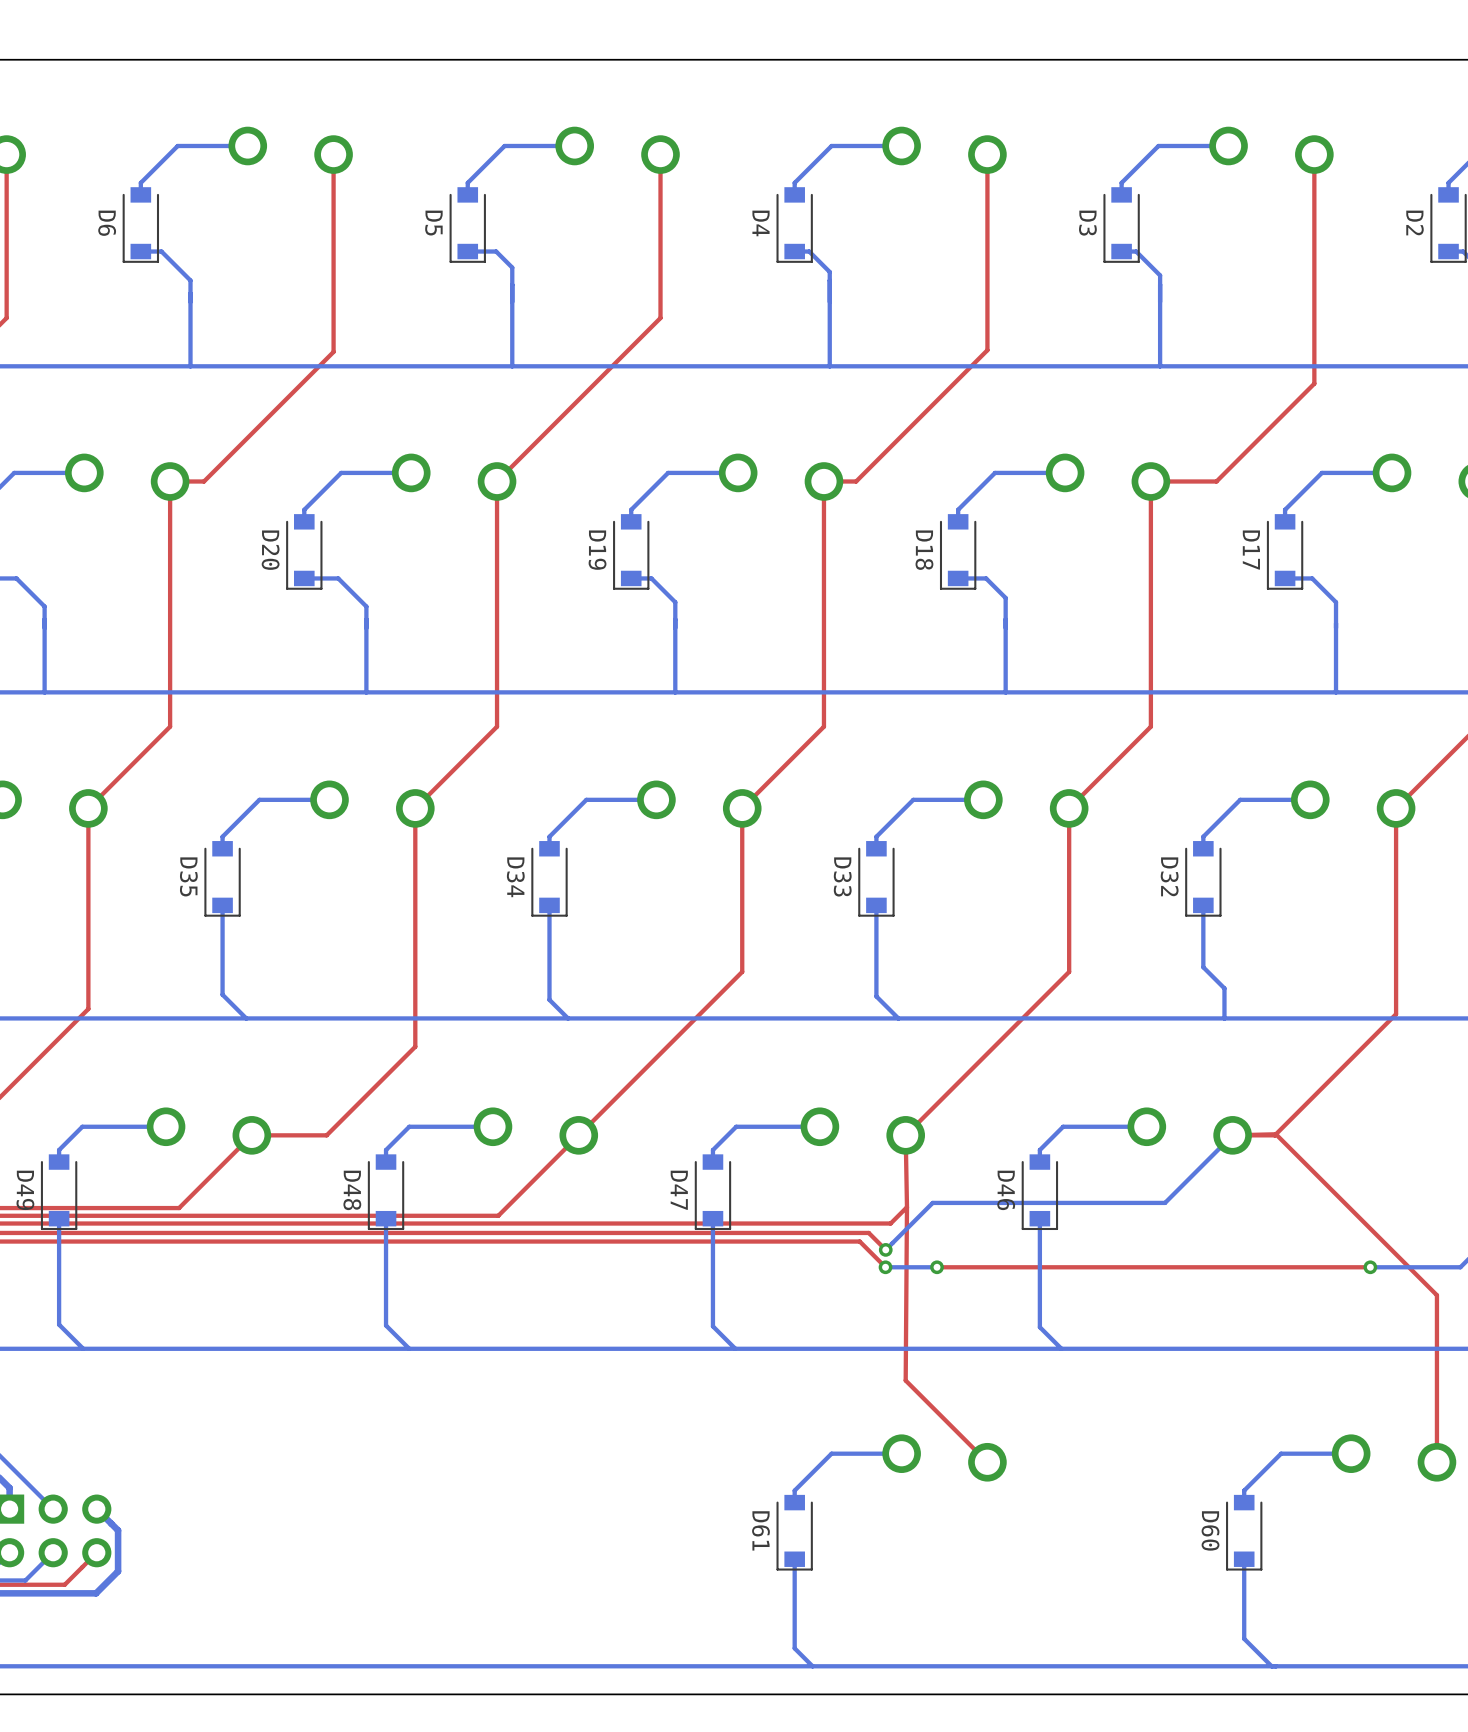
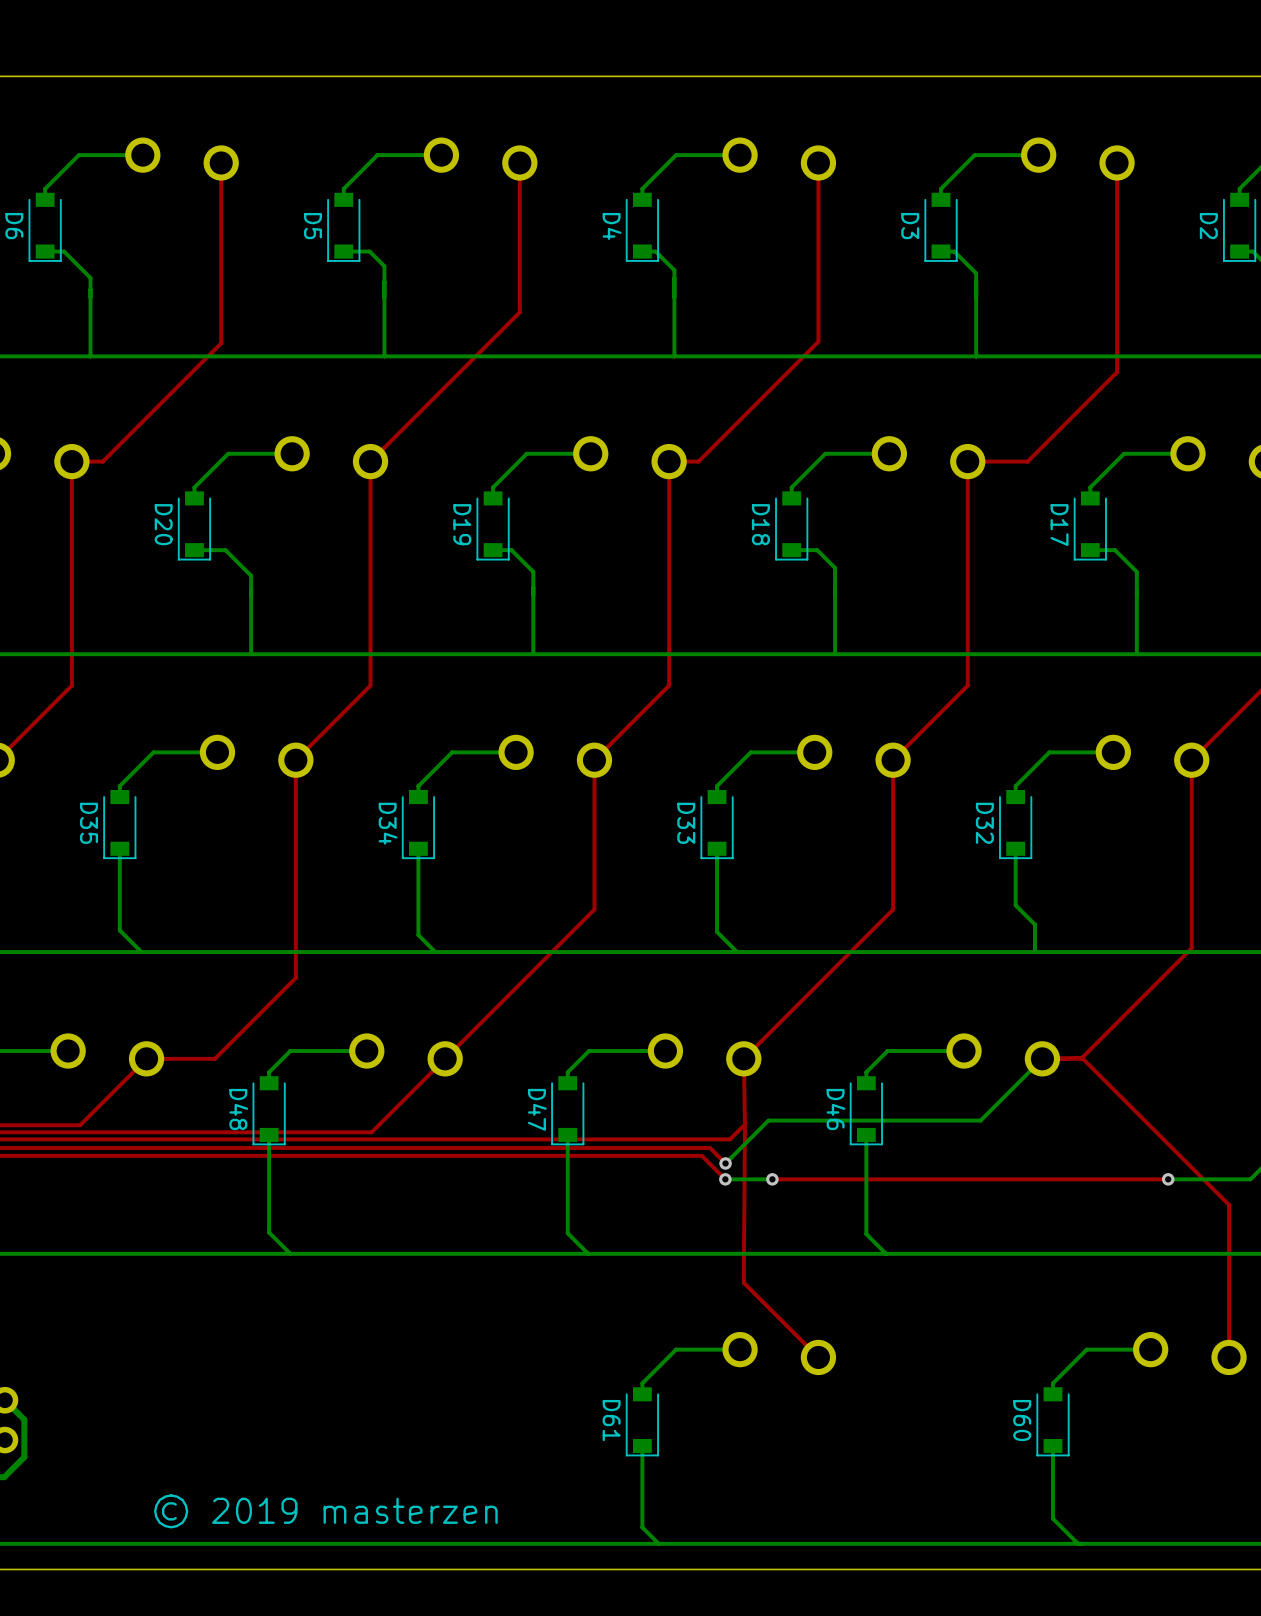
text: none -> © 2019 masterzen (325, 1511)

